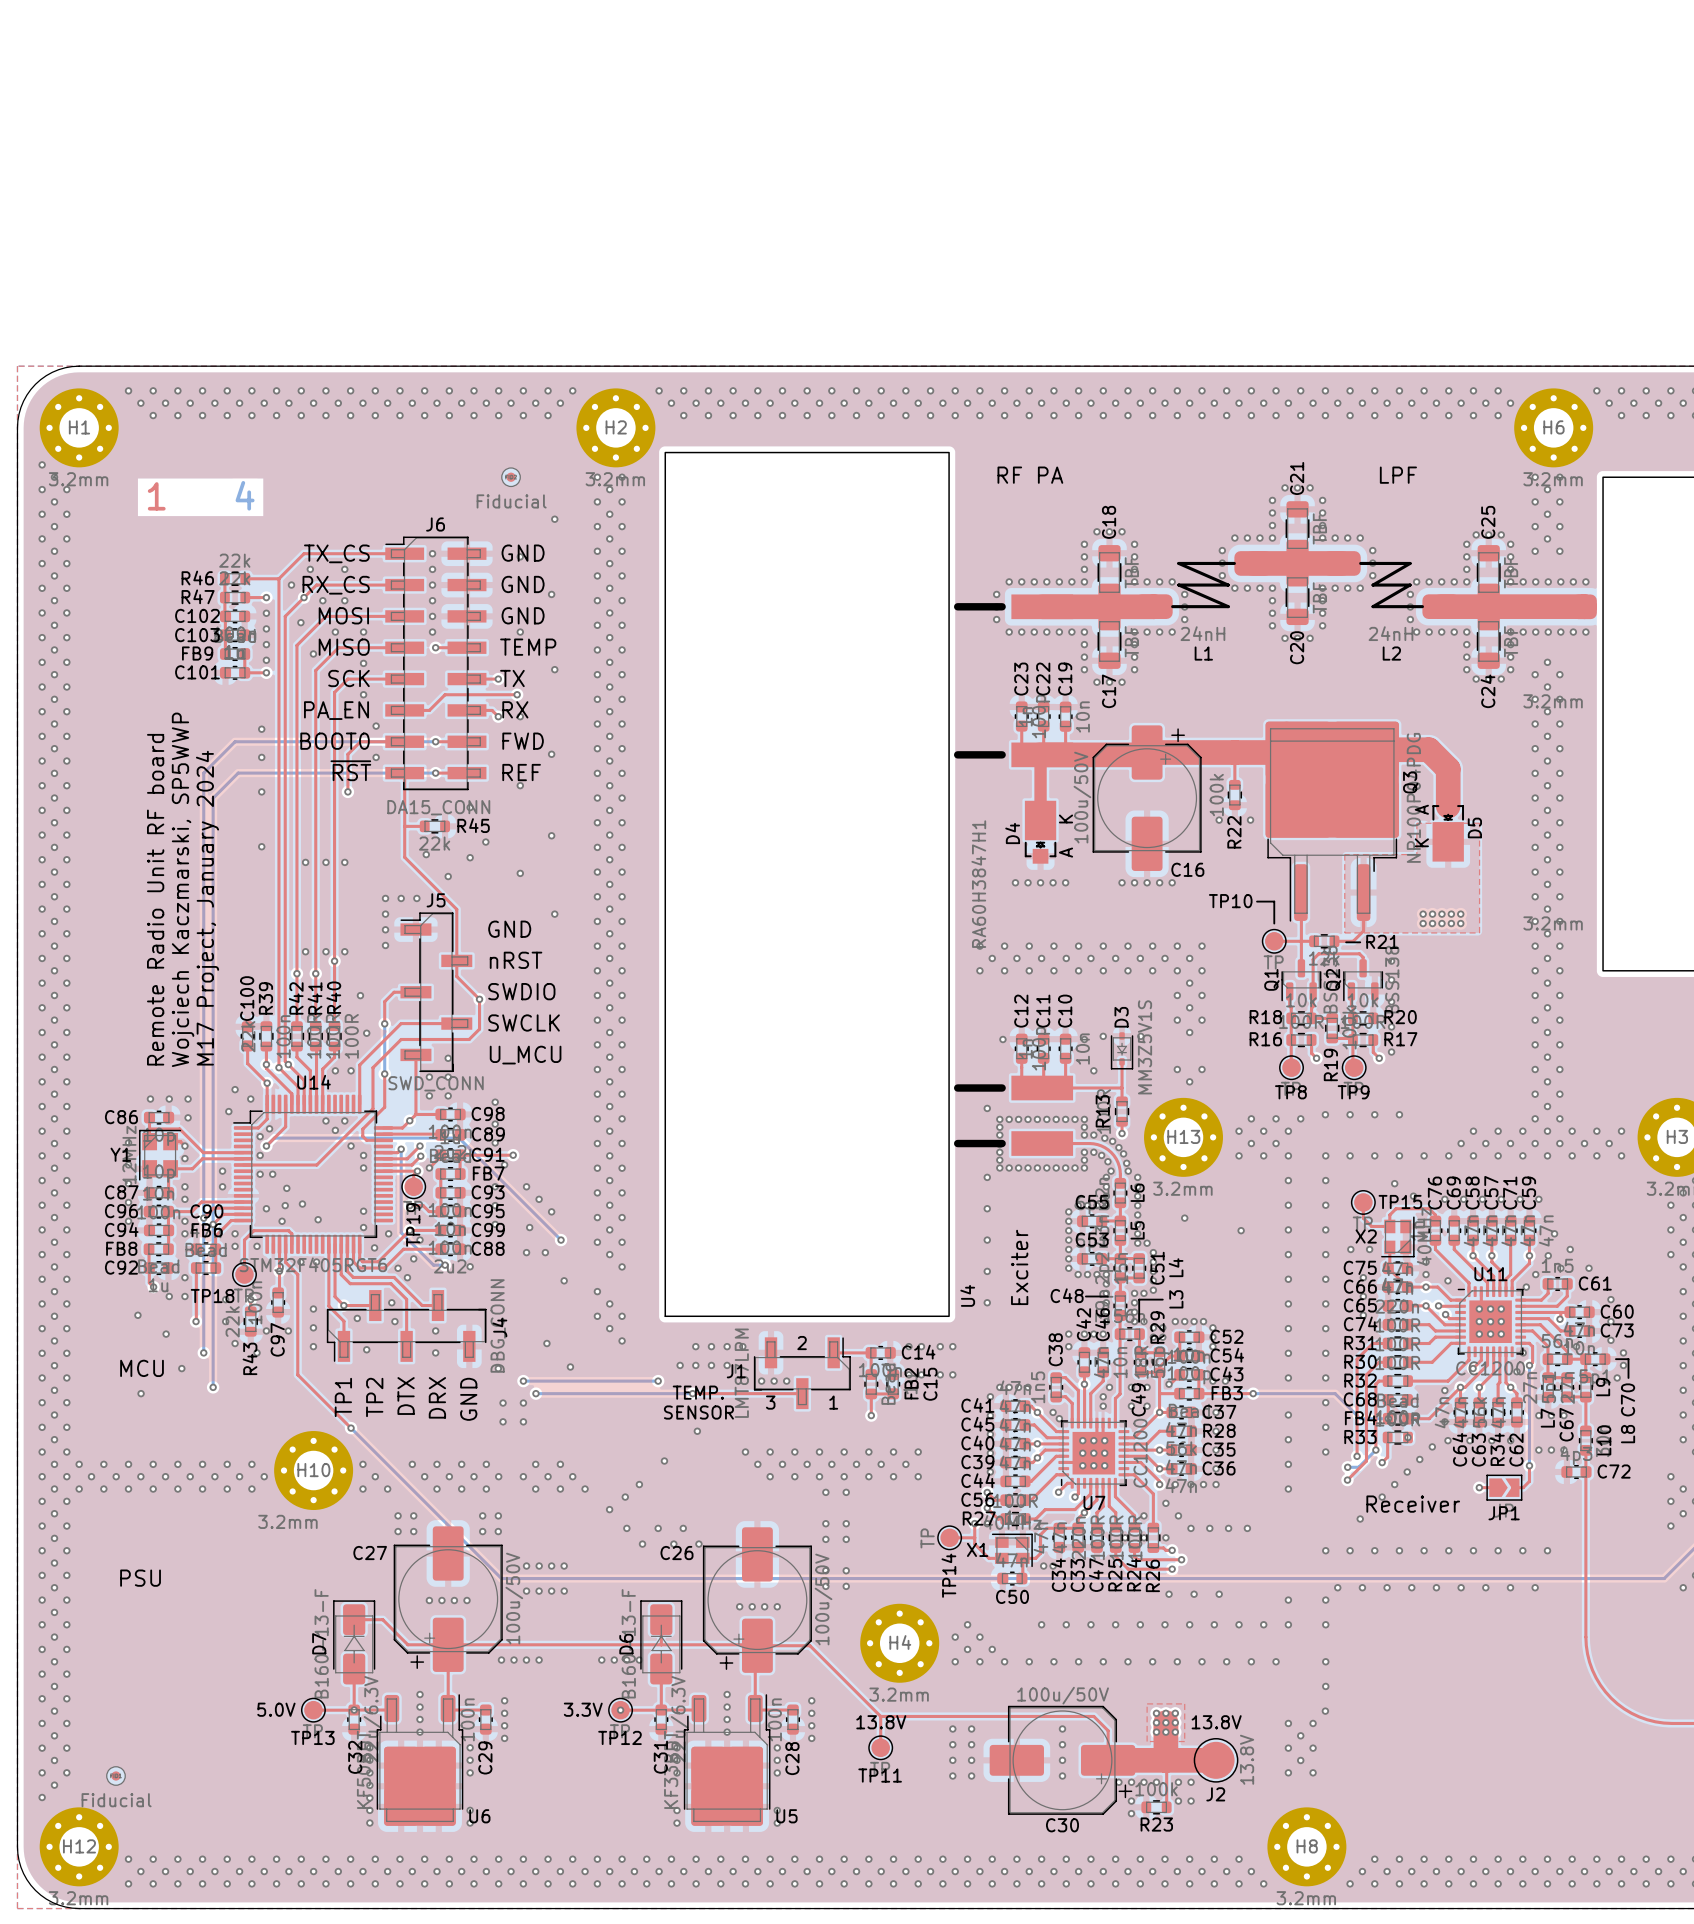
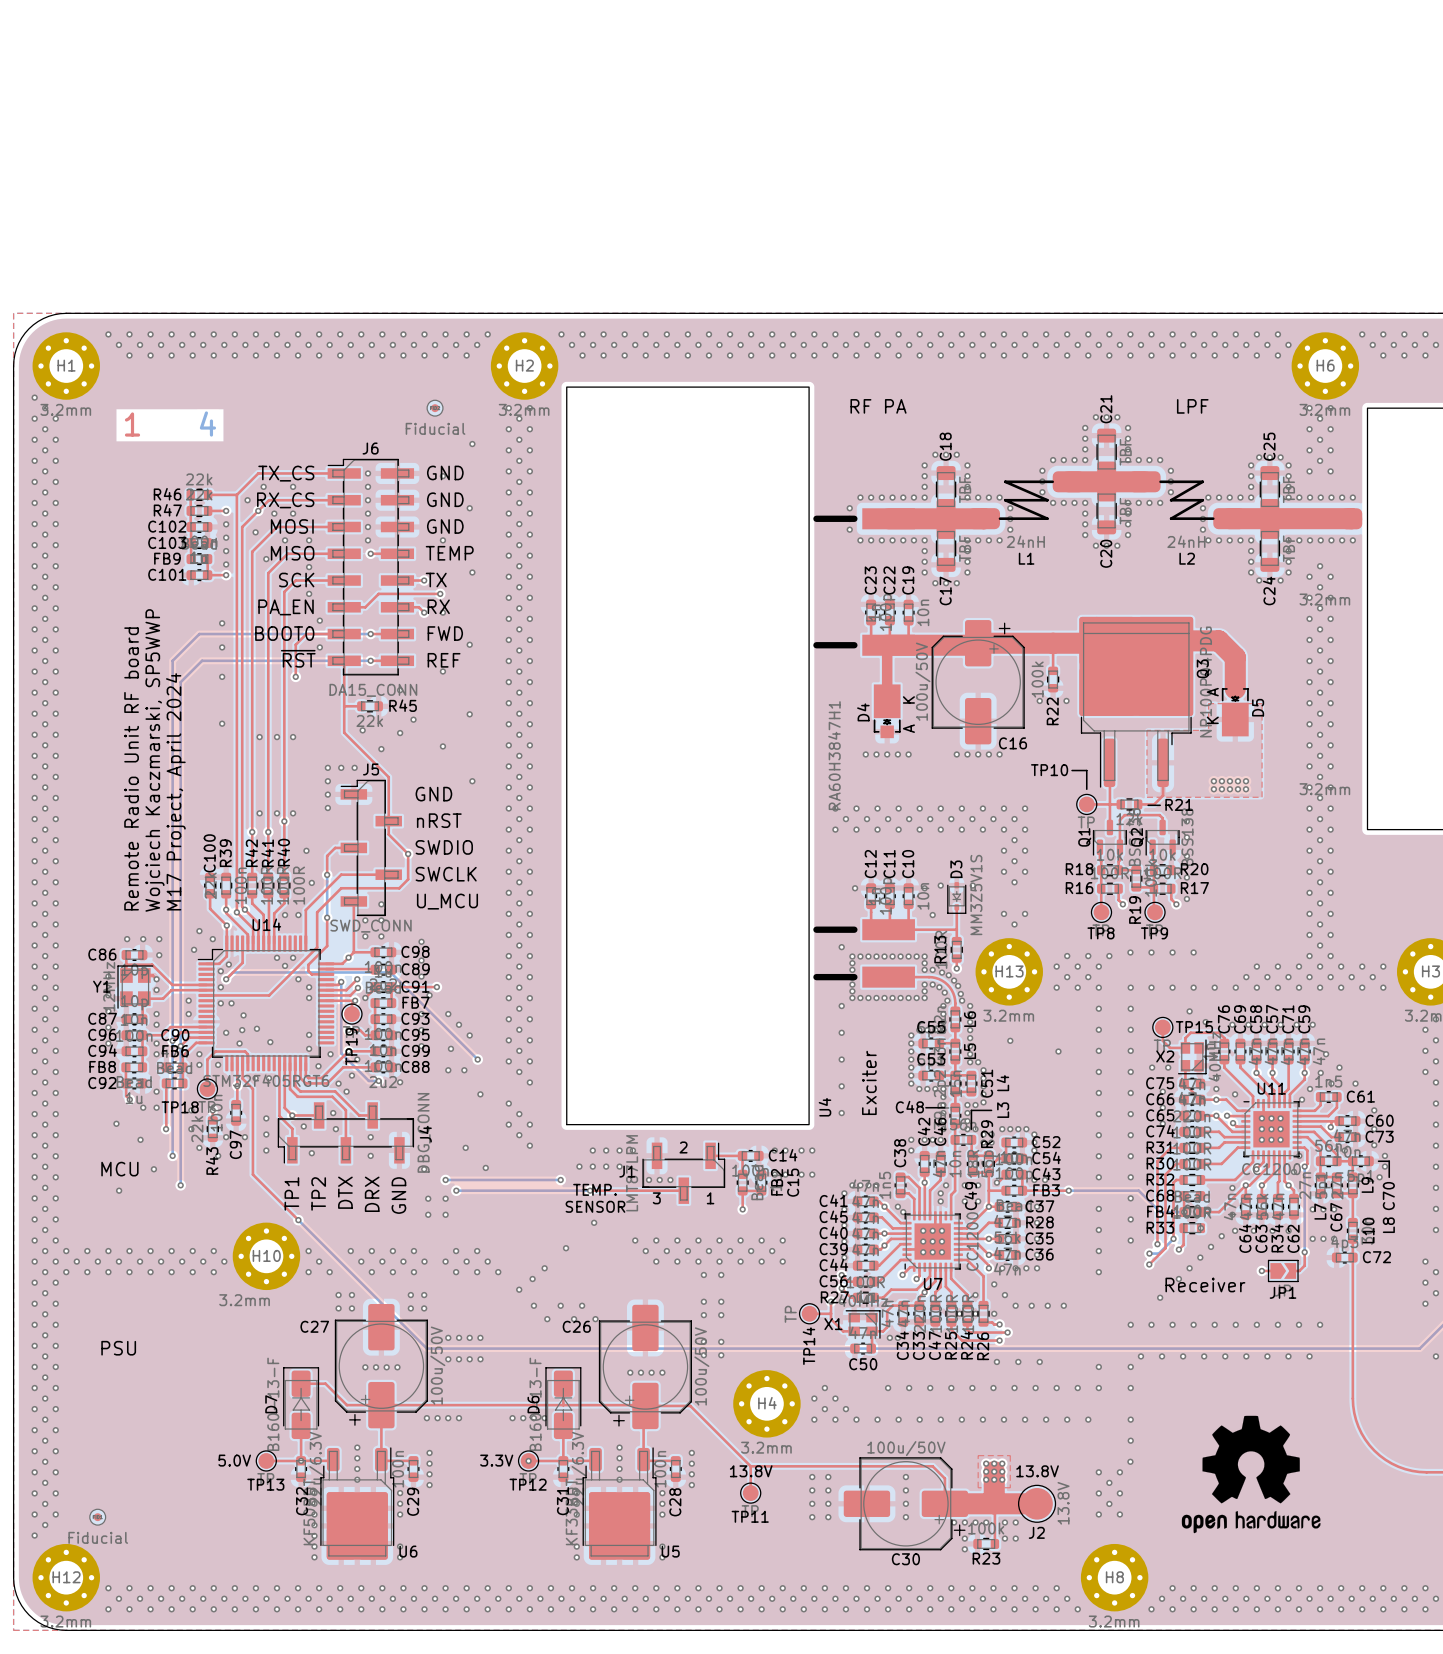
text: M17 Project, January 2024 (207, 908) -> M17 Project, April 2024 (175, 791)
drawing: none -> [1181, 1415, 1321, 1534]

